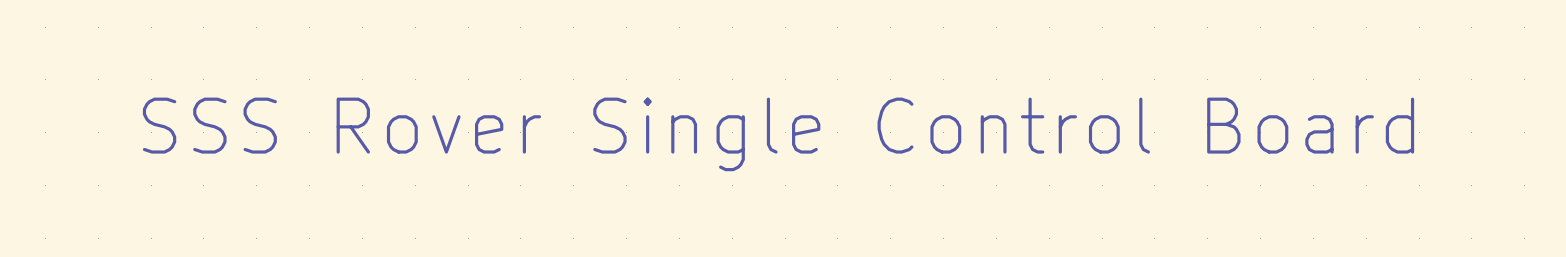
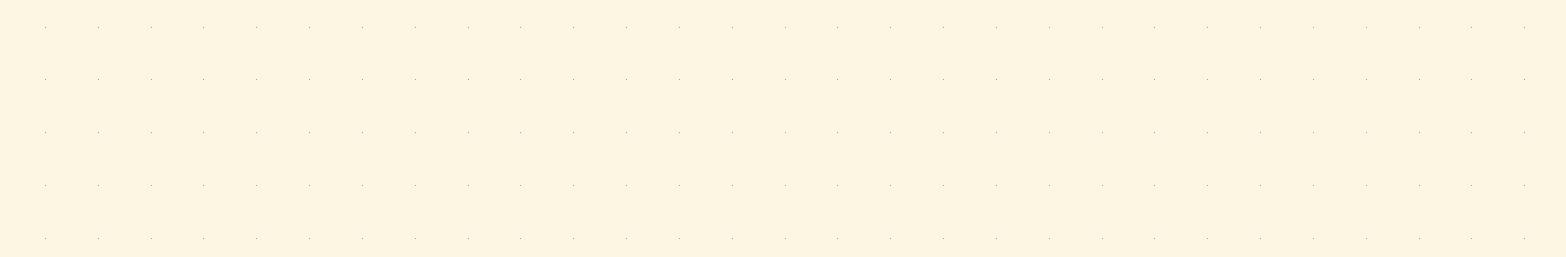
text: SSS Rover Single Control Board (778, 134) -> none

